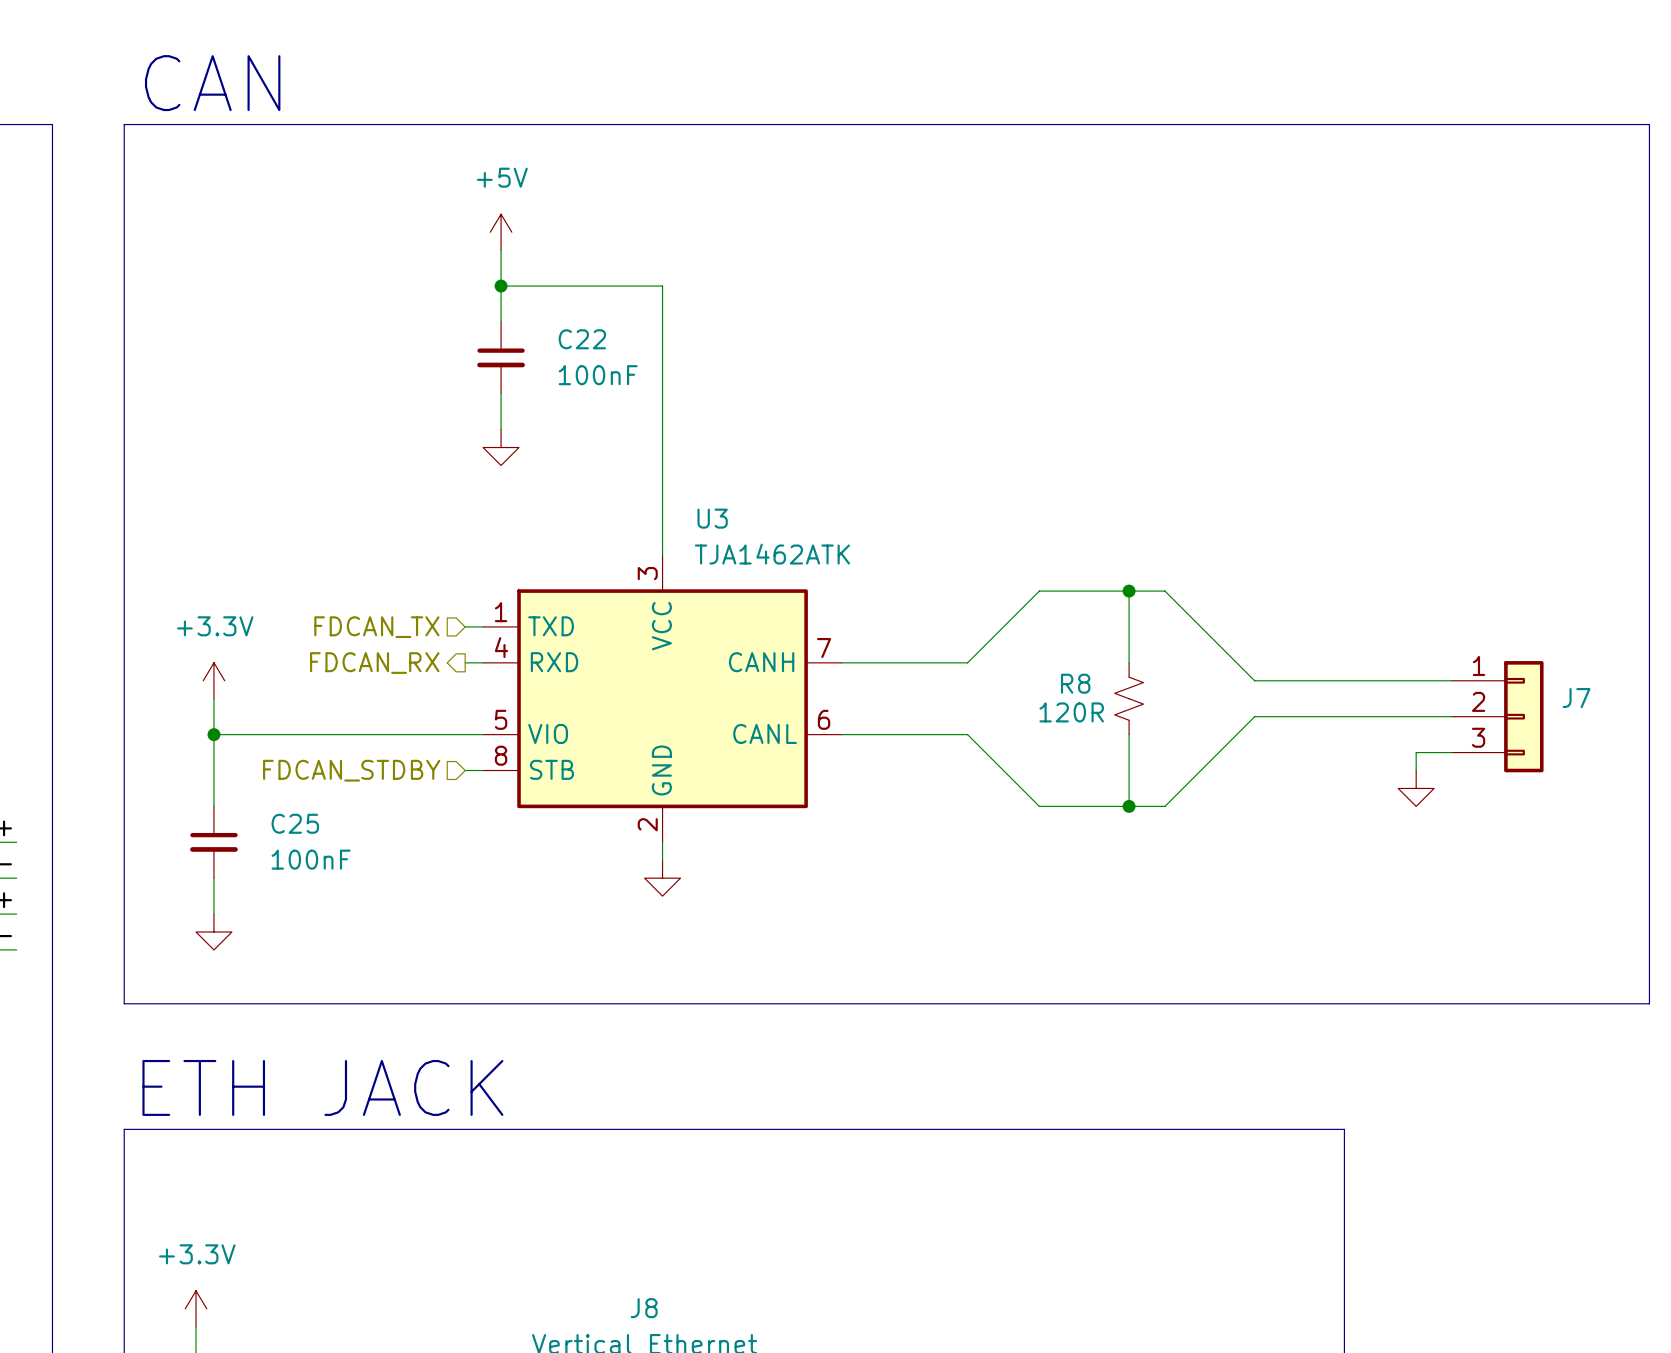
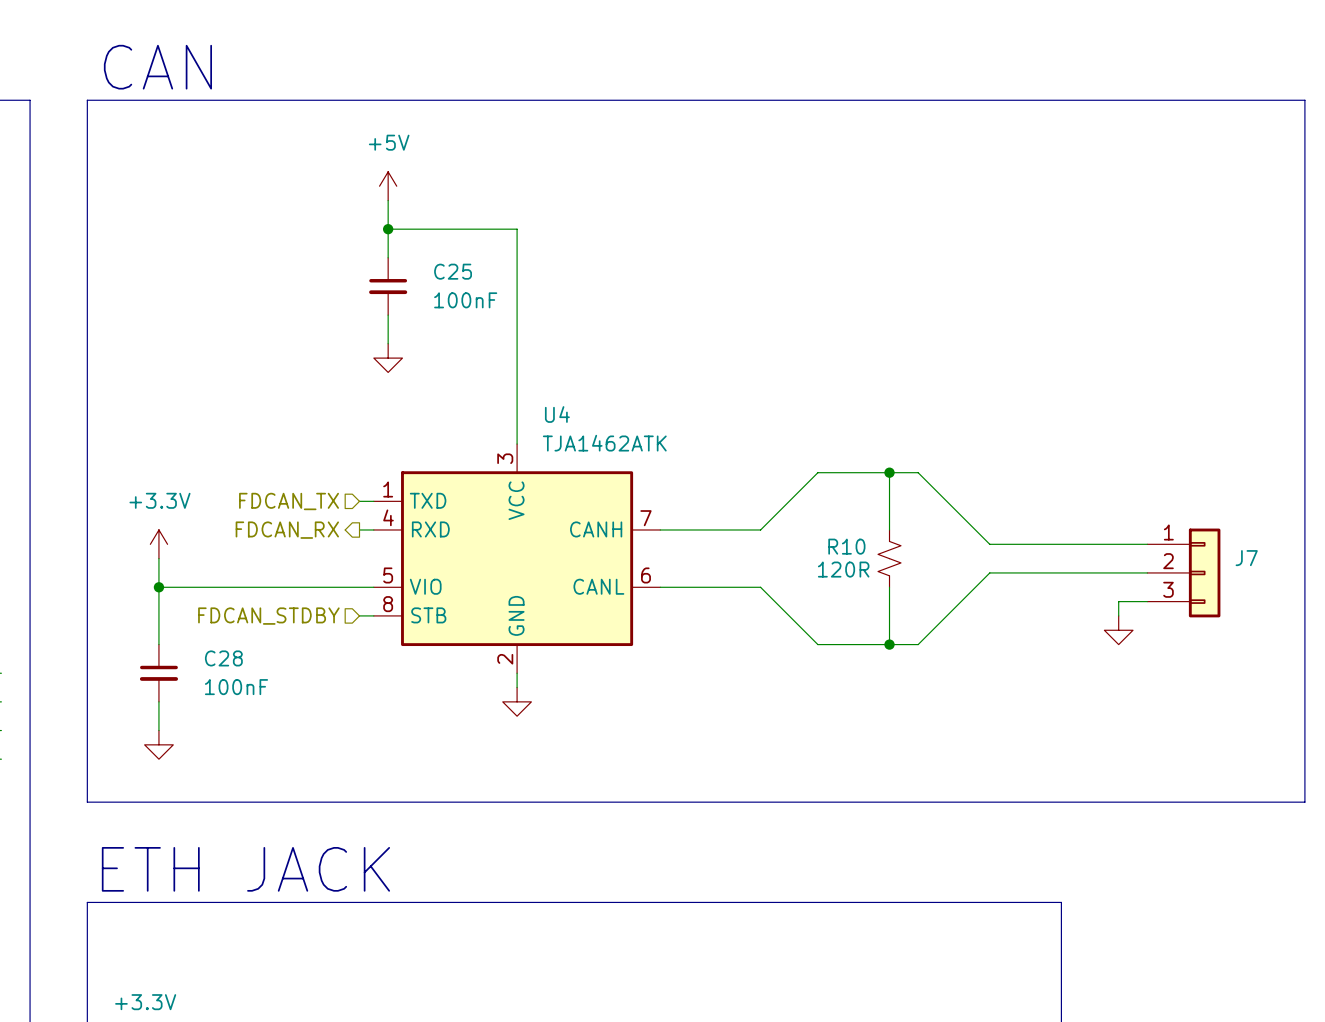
C22 name: C22 (582, 339) -> C25 (453, 271)
U3 name: U3 (712, 518) -> U4 (557, 414)
R8 name: R8 (1075, 683) -> R10 (846, 546)
C25 name: C25 (295, 823) -> C28 (223, 658)

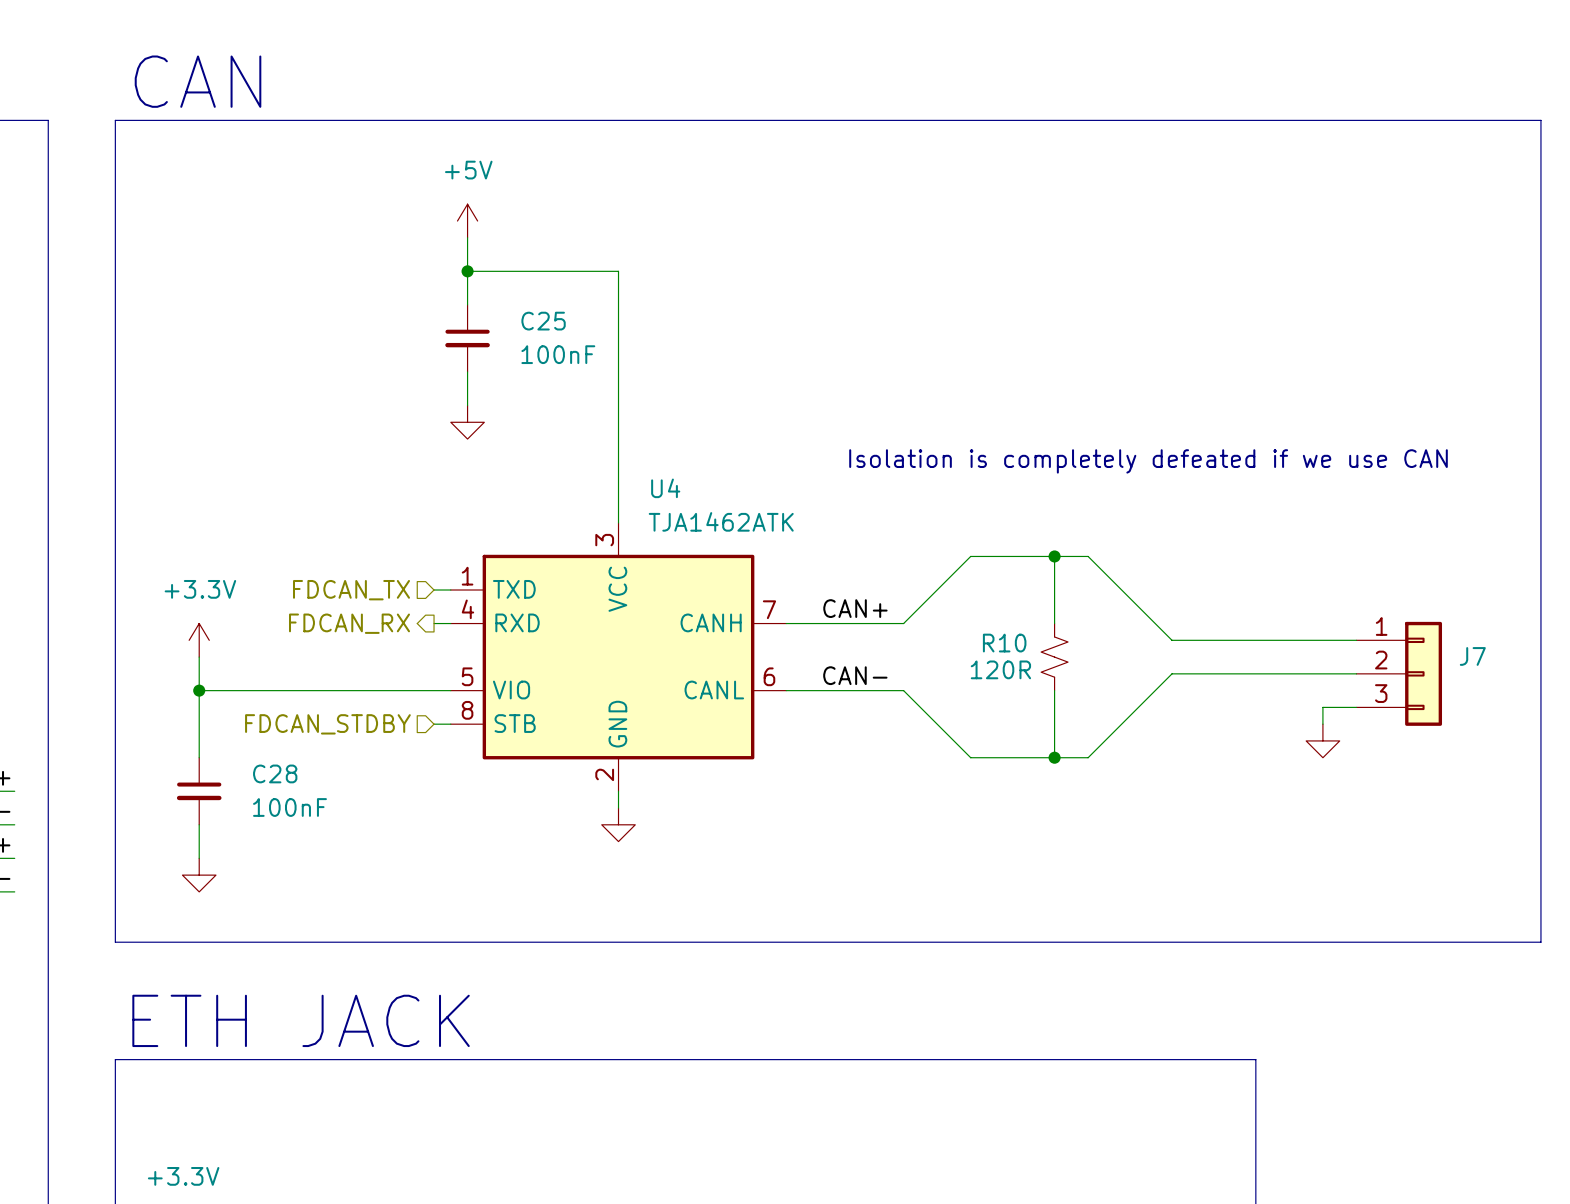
text: none -> Isolation is completely defeated if we use CAN (1148, 461)
label: none -> CAN+ (855, 608)
label: none -> CAN- (855, 675)

